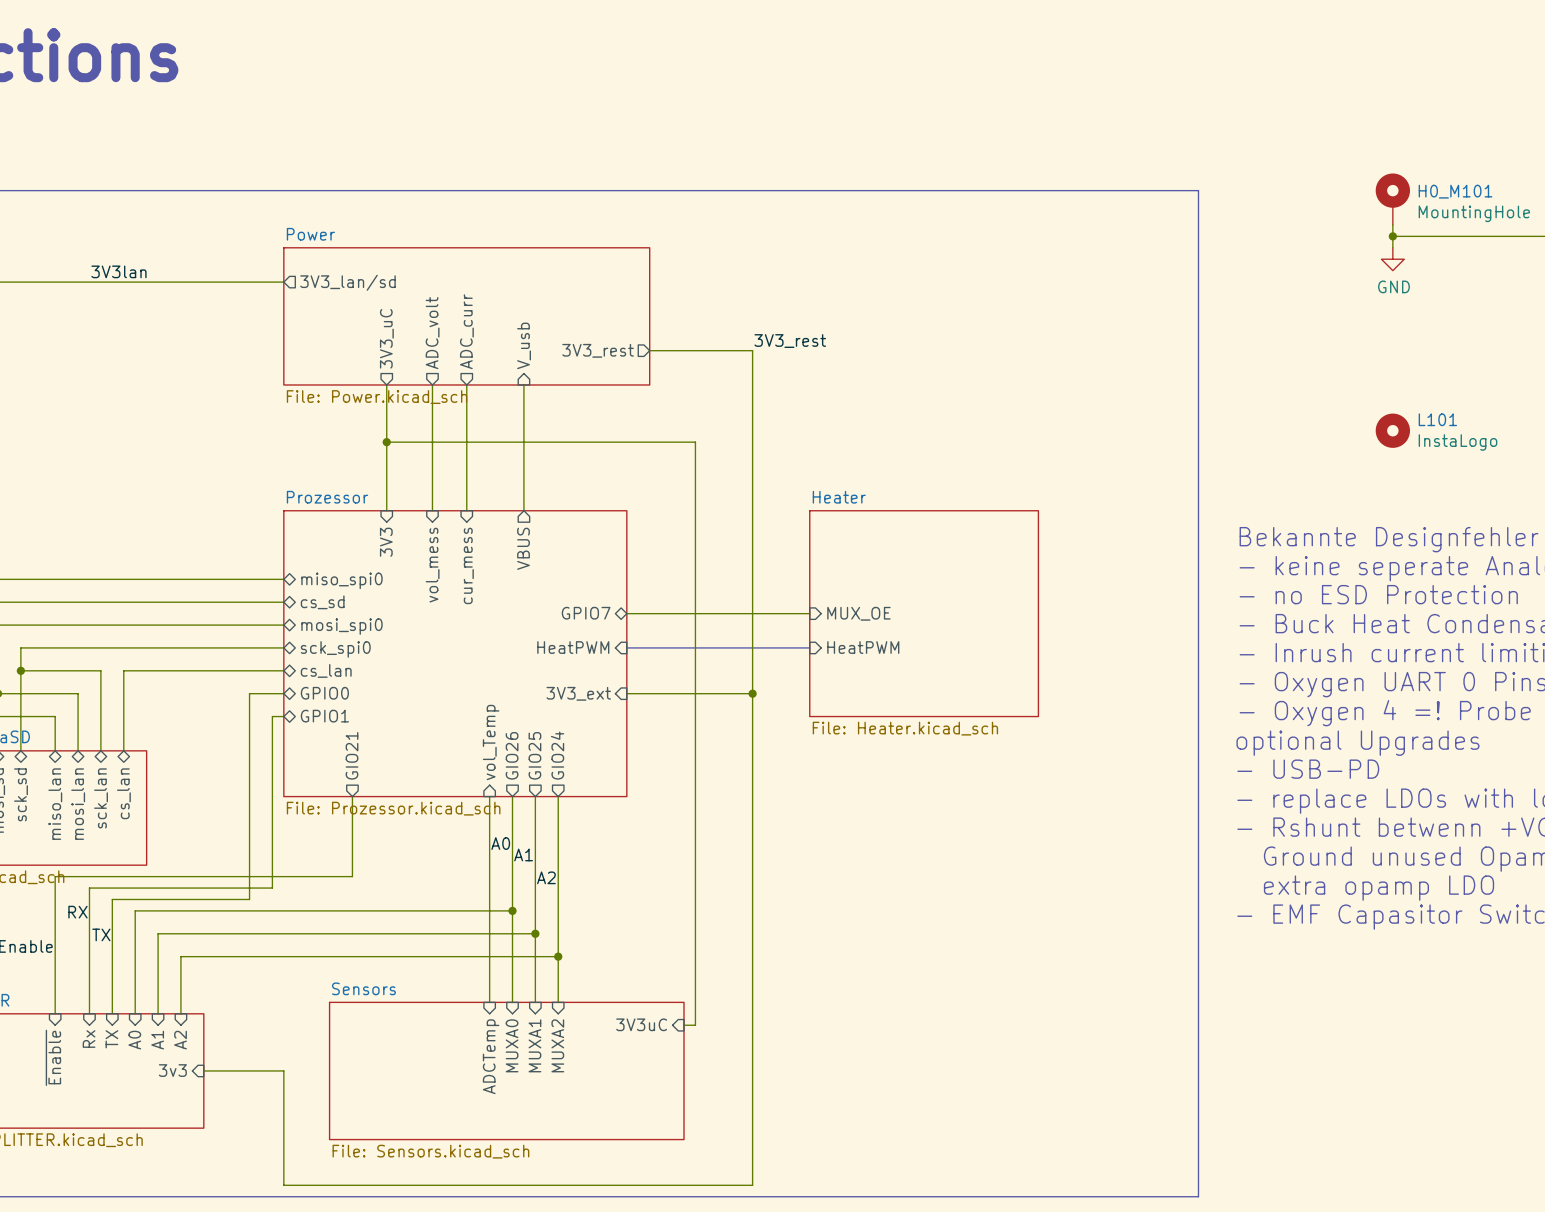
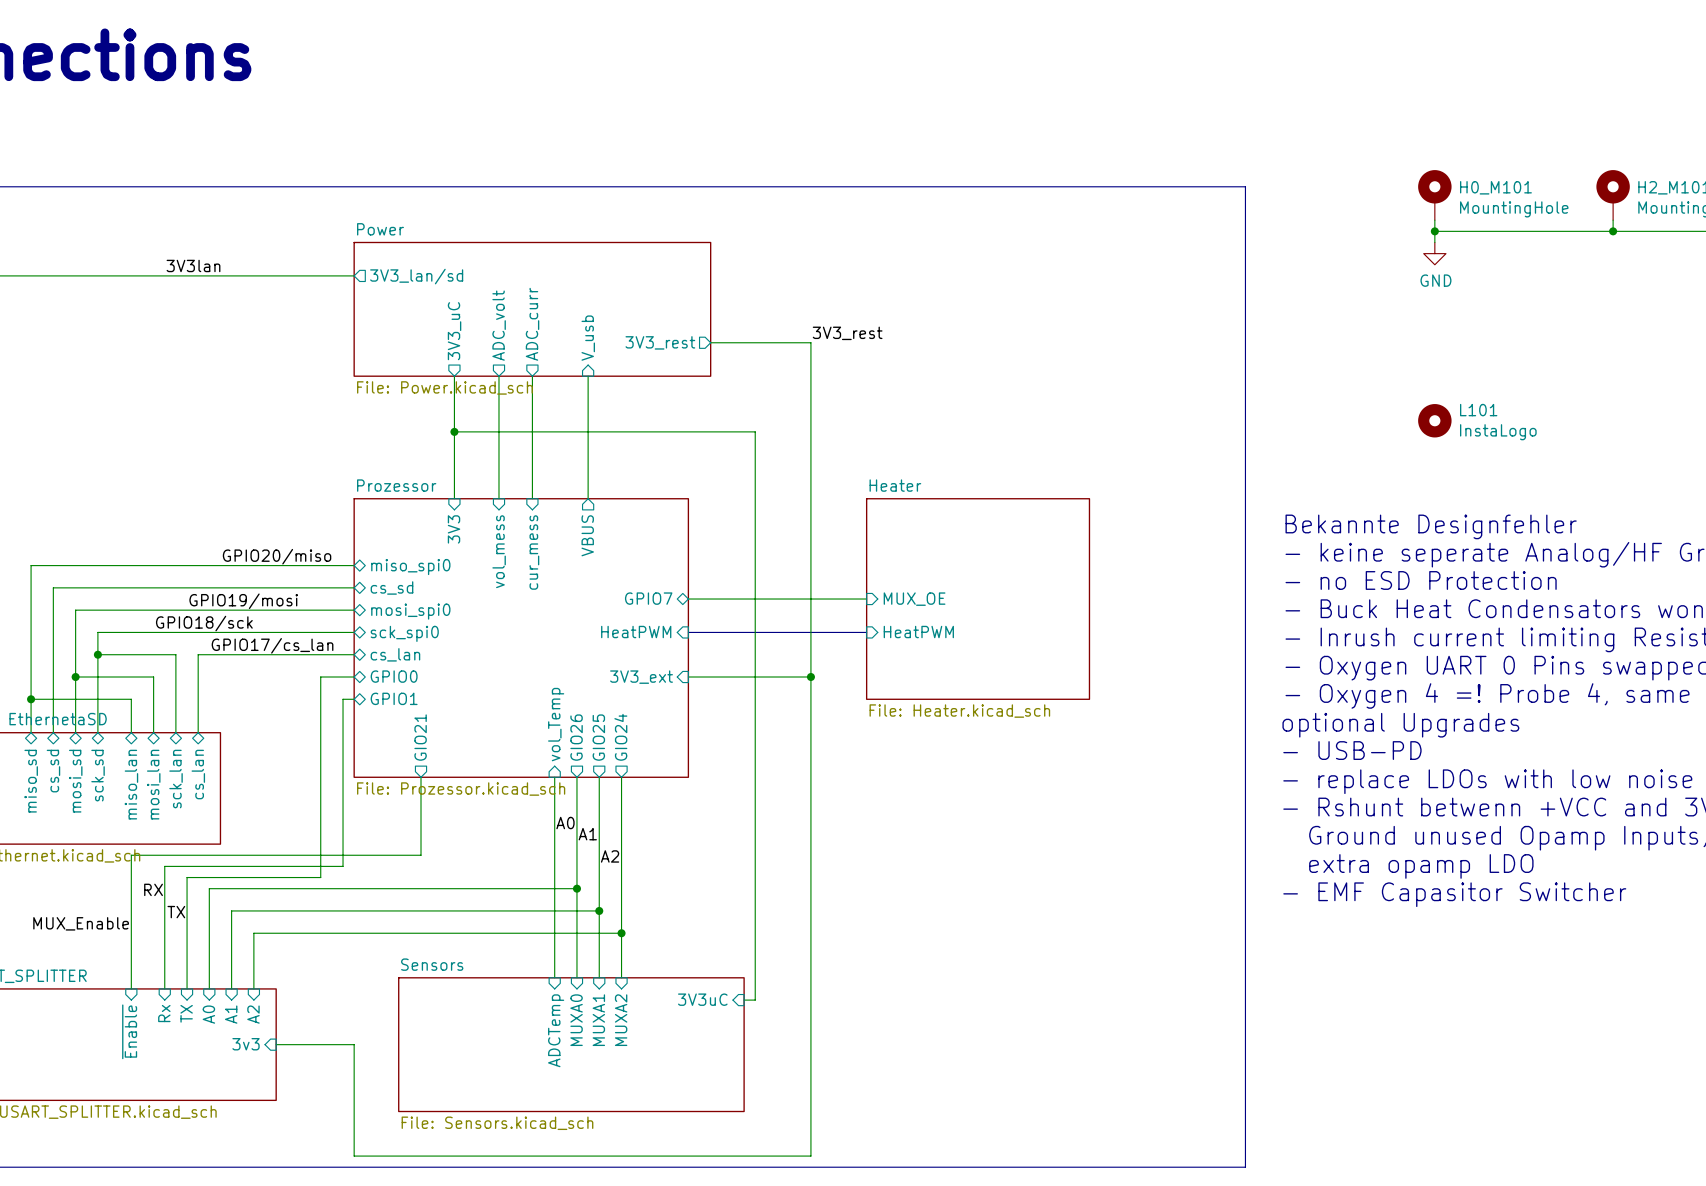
label: none -> GPIO20/miso (277, 556)
label: none -> GPIO19/mosi (243, 601)
label: none -> GPIO18/sck (204, 623)
label: none -> GPIO17/cs_lan (272, 645)

